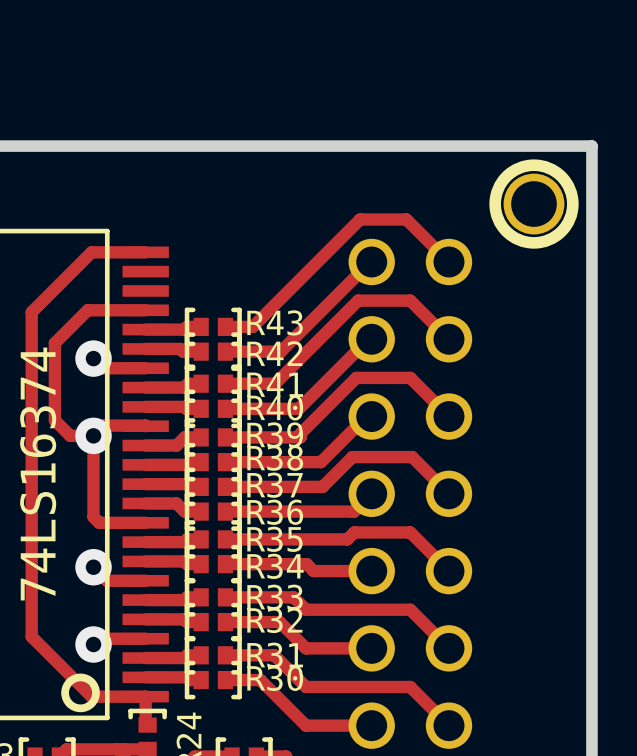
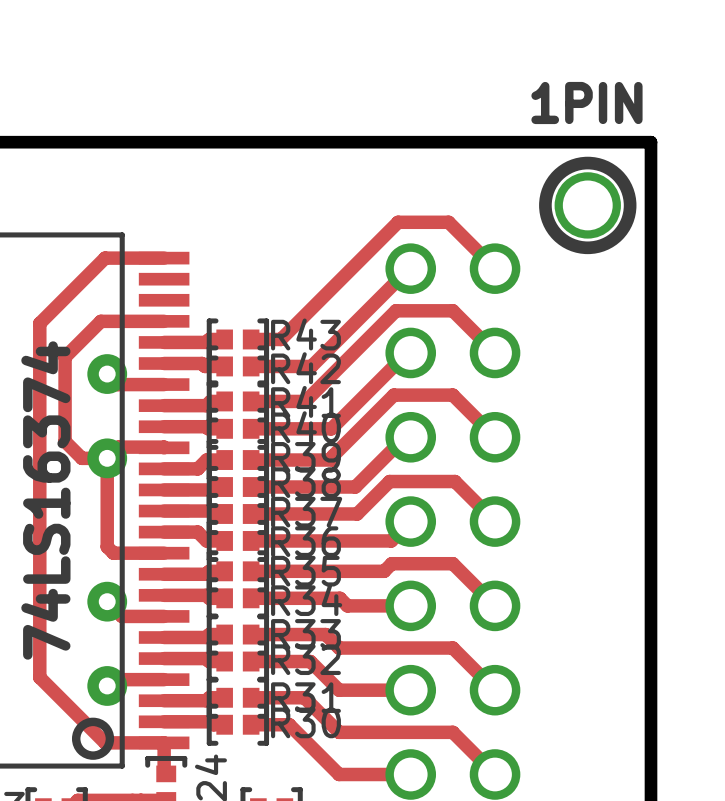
1PIN name: none -> 1PIN (586, 103)

